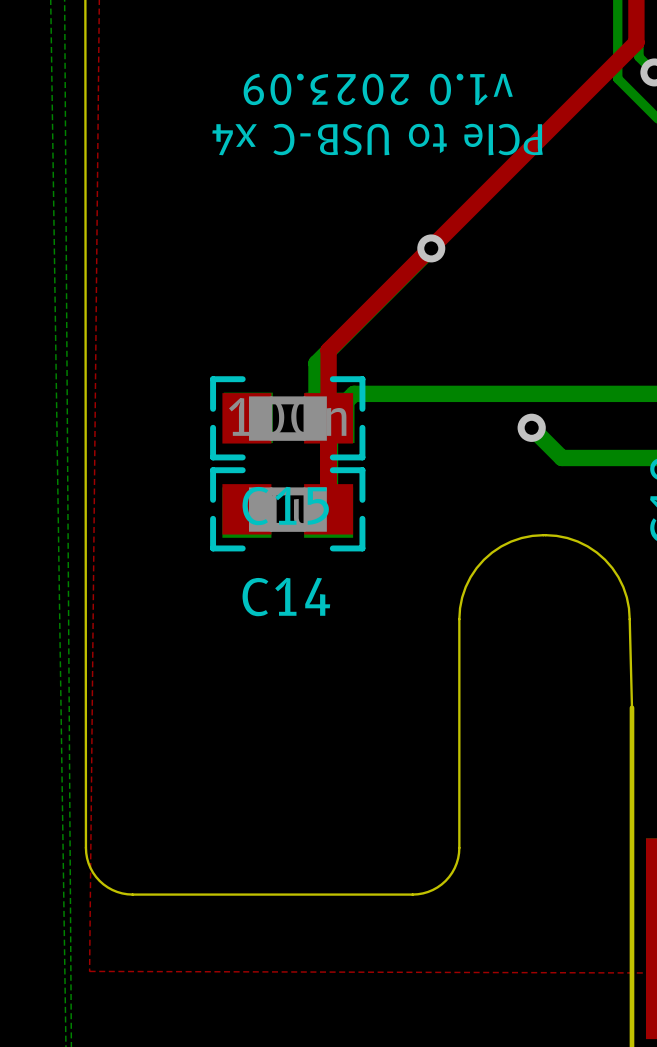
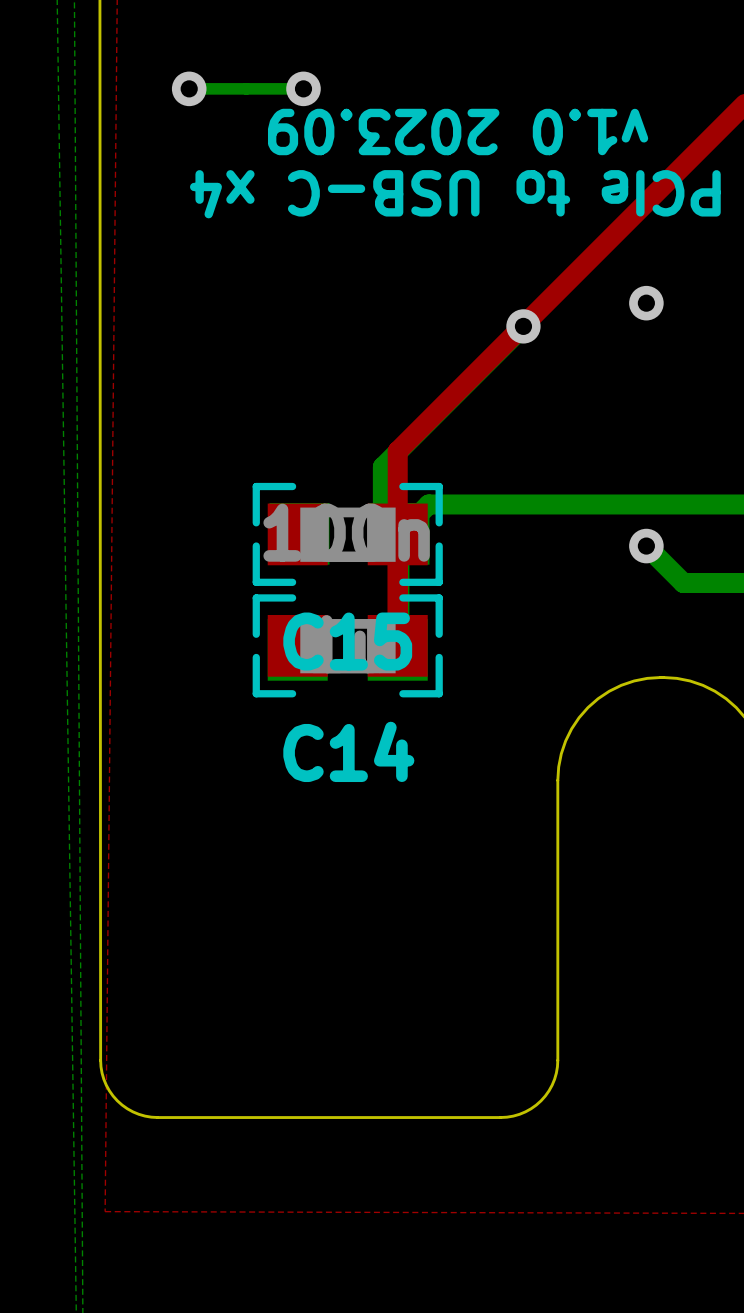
bottom track: none -> (189, 88) (303, 88)
via: none -> (189, 88)
via: none -> (303, 88)
via: none -> (646, 303)

